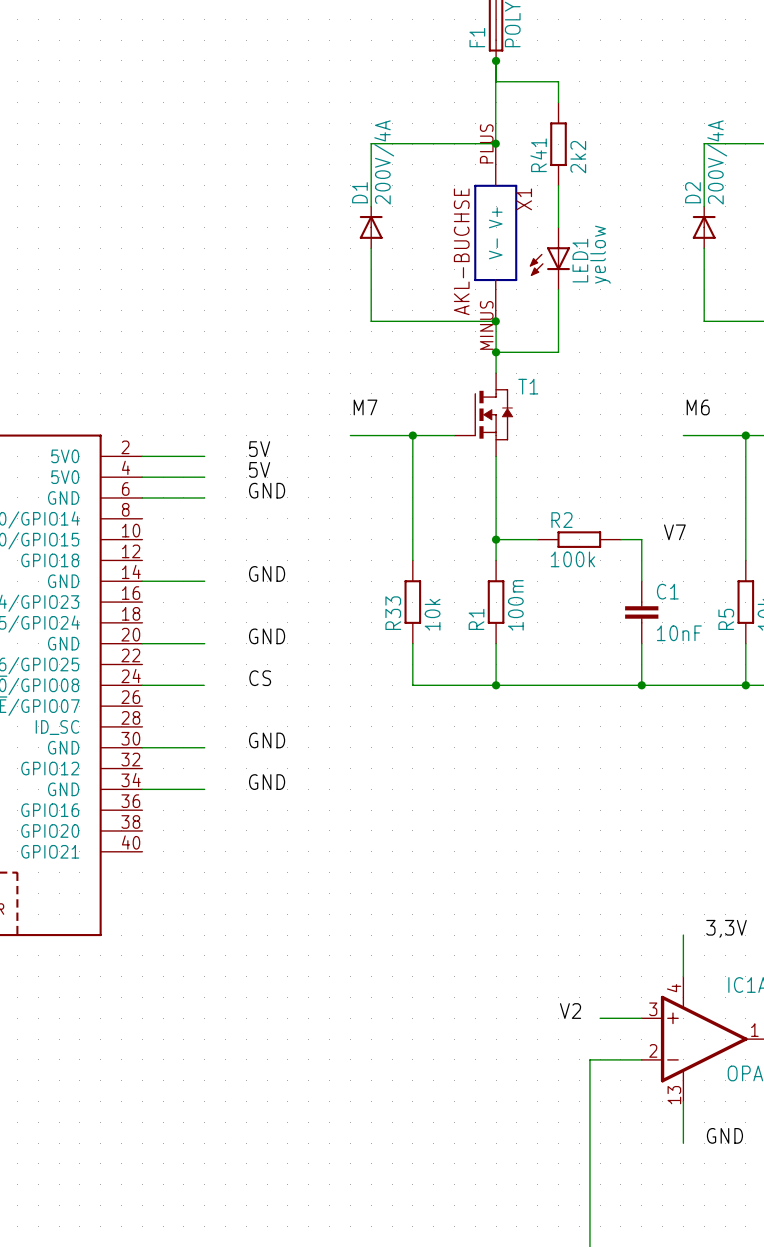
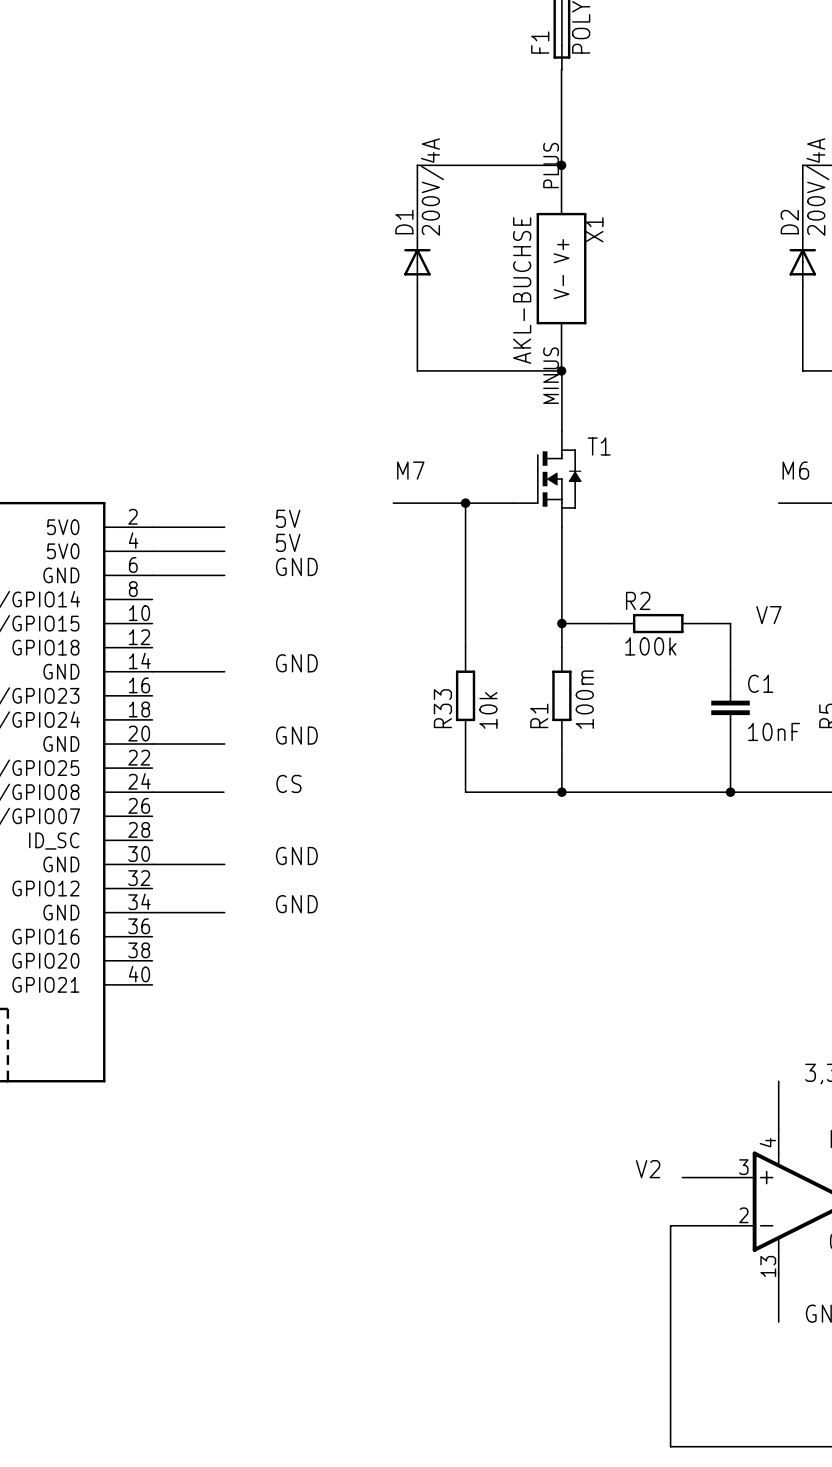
wire: (496, 60) (496, 81) (558, 81) (558, 102) -> none
junction: (496, 60) -> none
R41: 2k2 (558, 144) -> none
wire: (558, 185) (558, 227) -> none
LED1: yellow (549, 258) -> none
wire: (558, 289) (558, 352) (496, 352) -> none
junction: (496, 352) -> none

